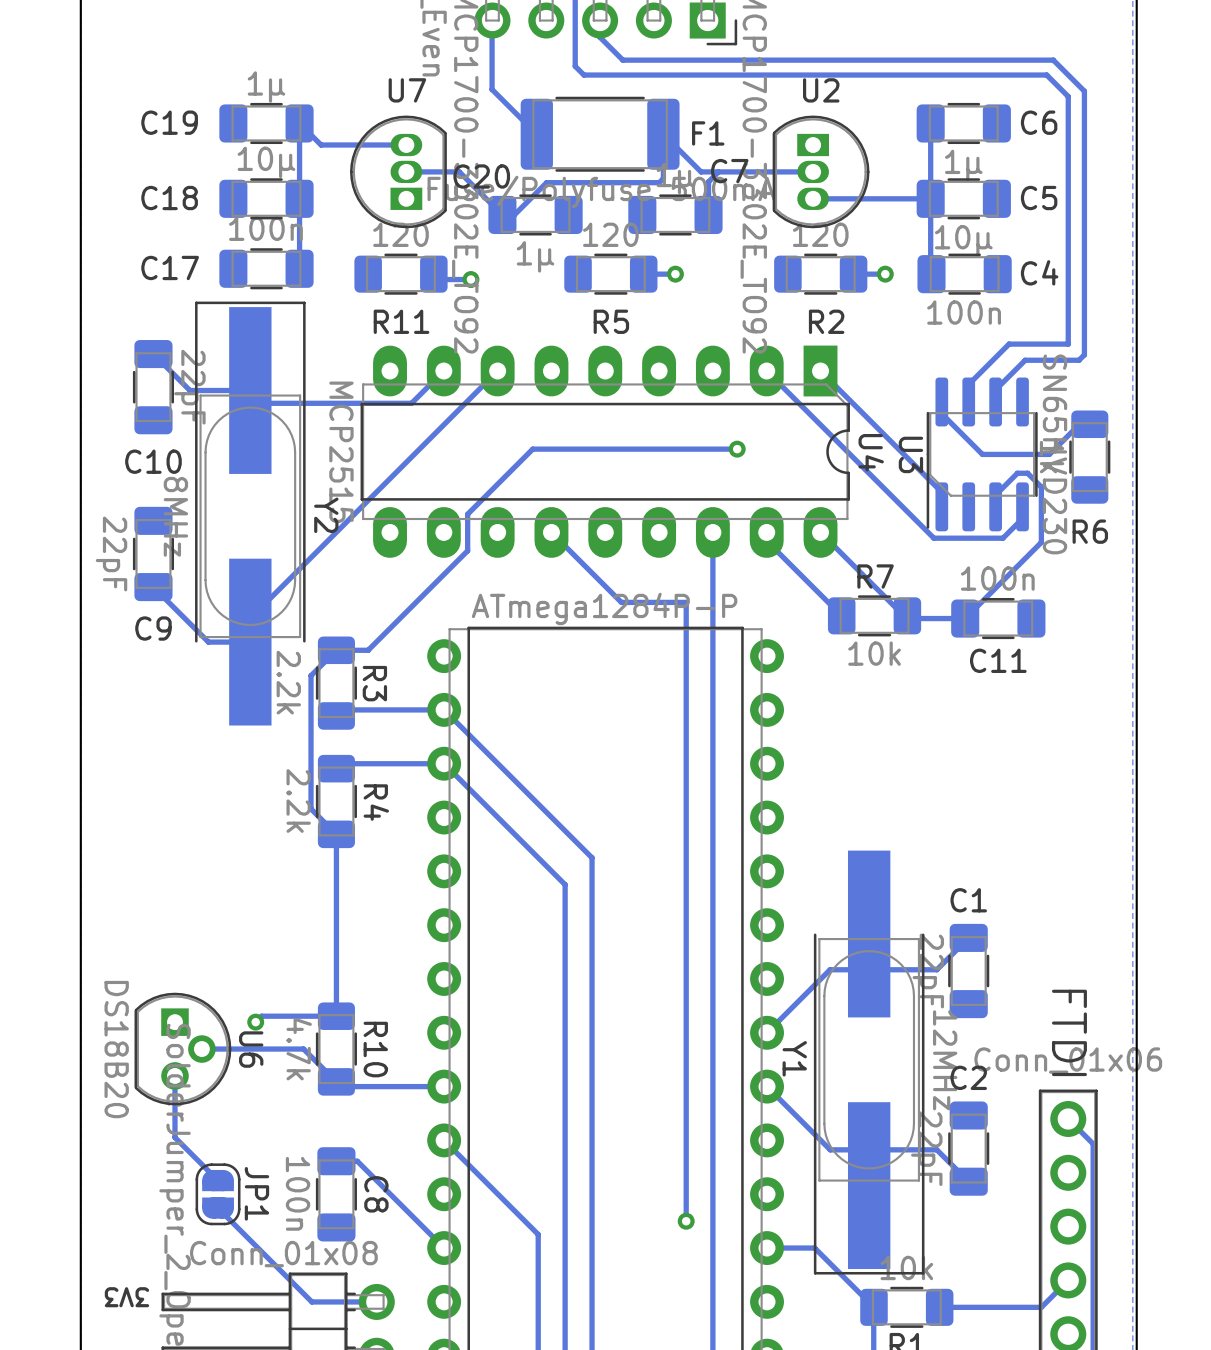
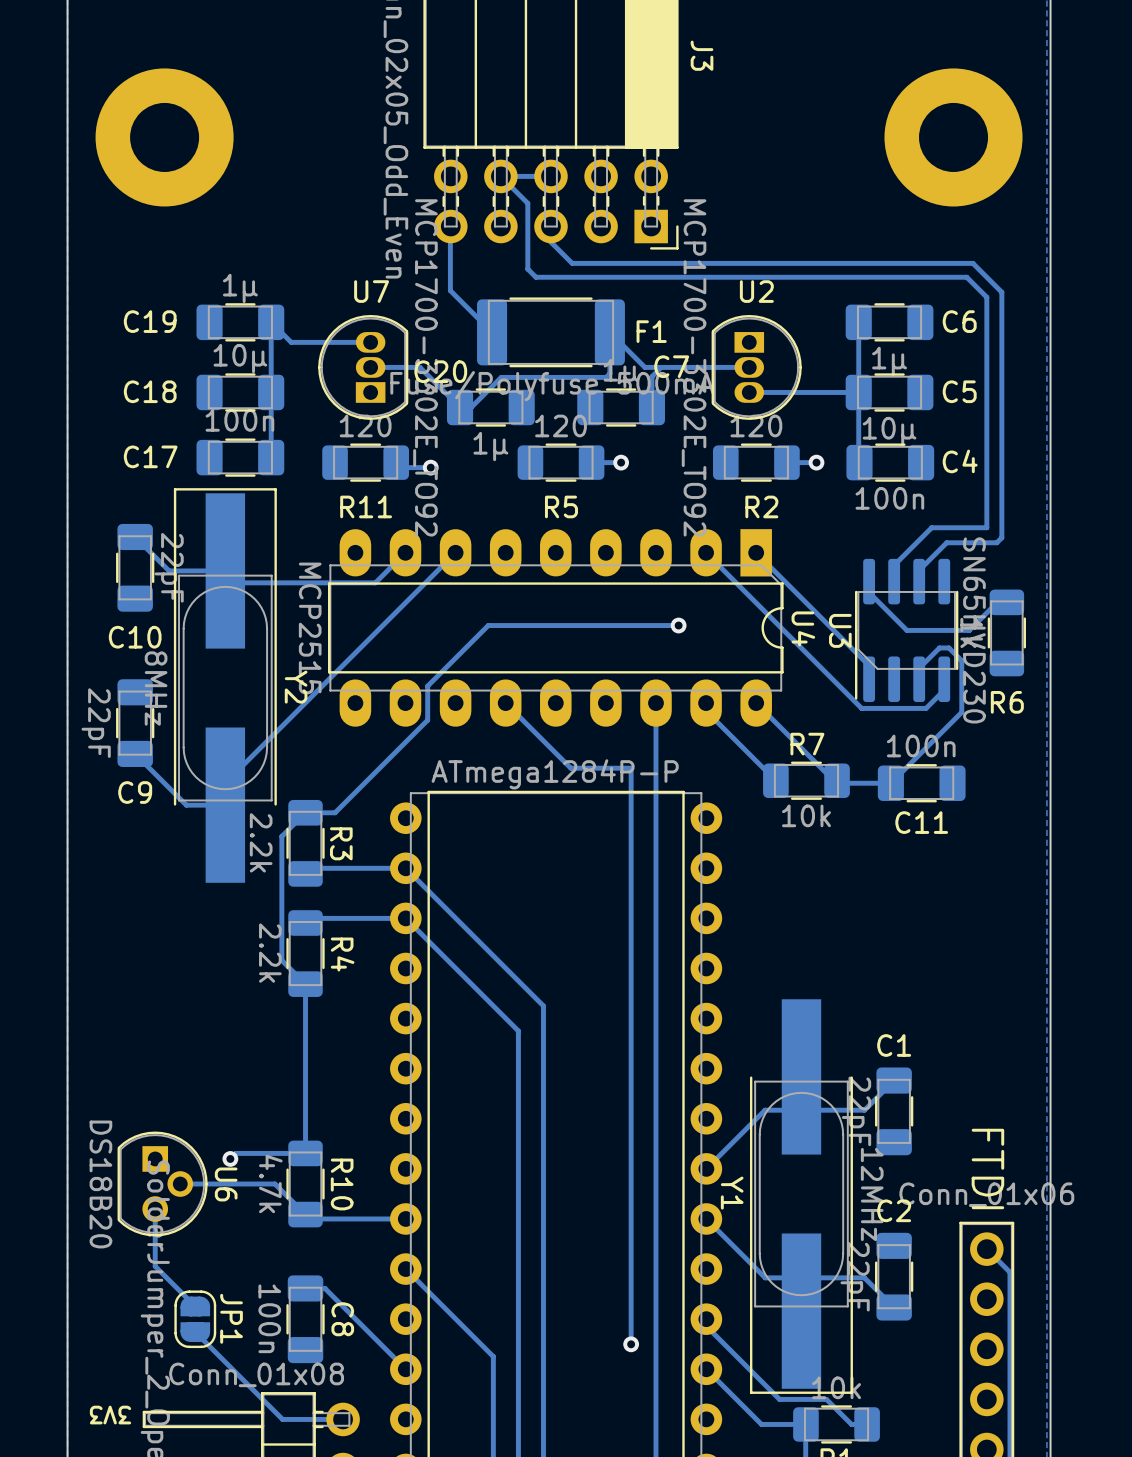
track: (767, 1248) (814, 1248) (873, 1307) -> (706, 1369) (761, 1424) (805, 1424)
track: (1068, 1280) (1041, 1307) (939, 1307) -> (706, 1319) (706, 1326) (779, 1399) (826, 1399) (851, 1424) (867, 1424)

